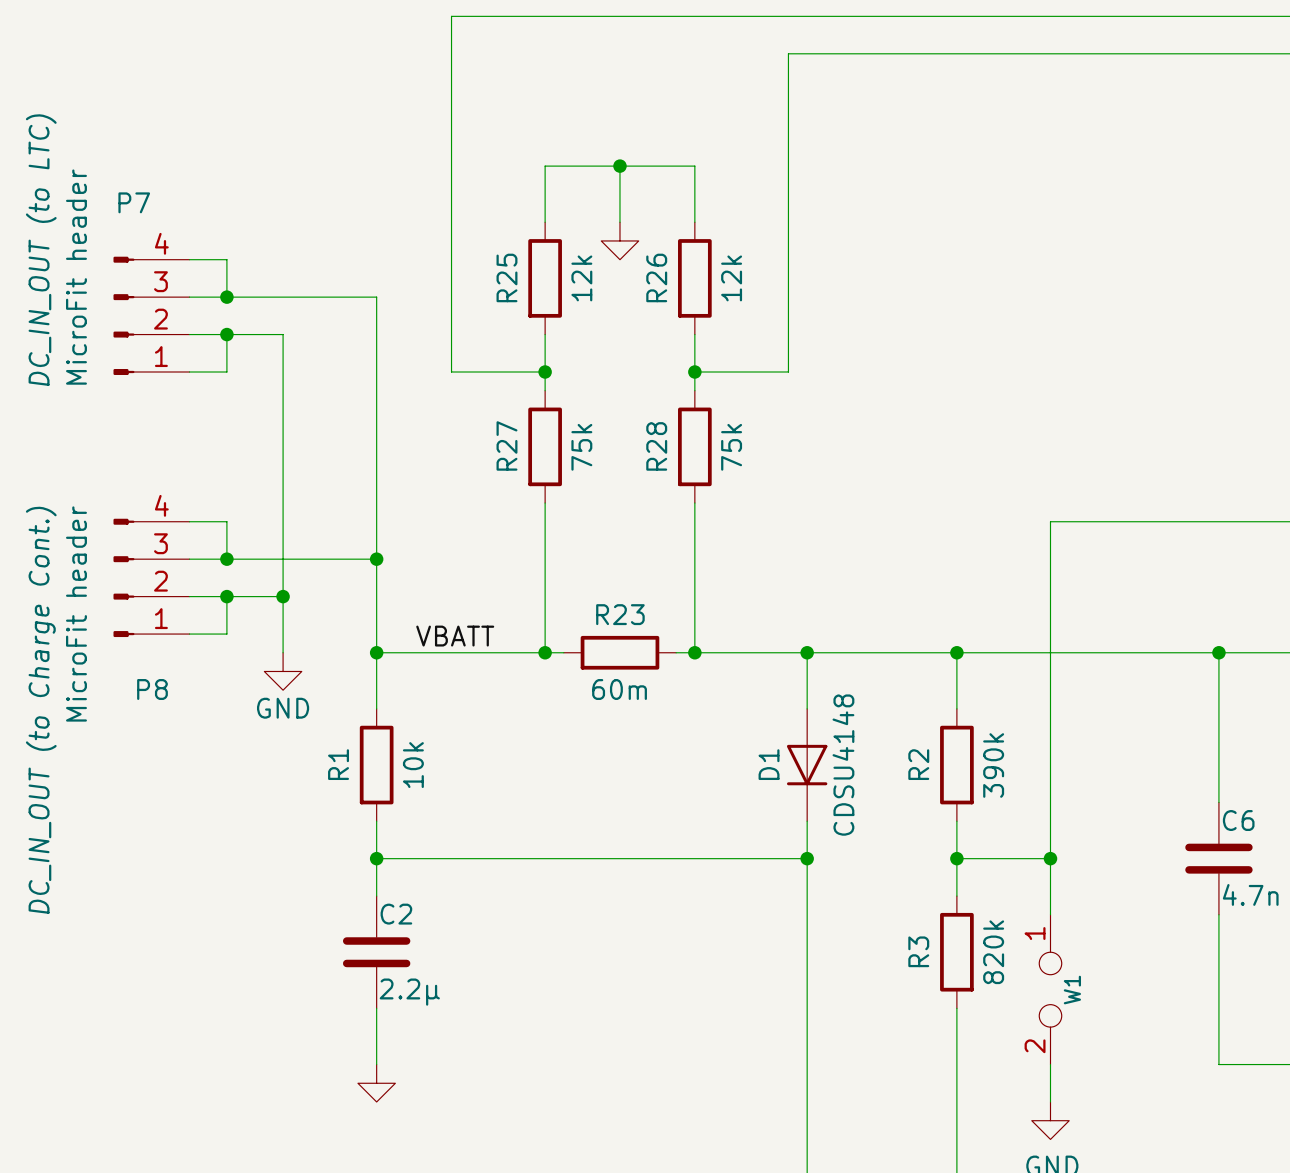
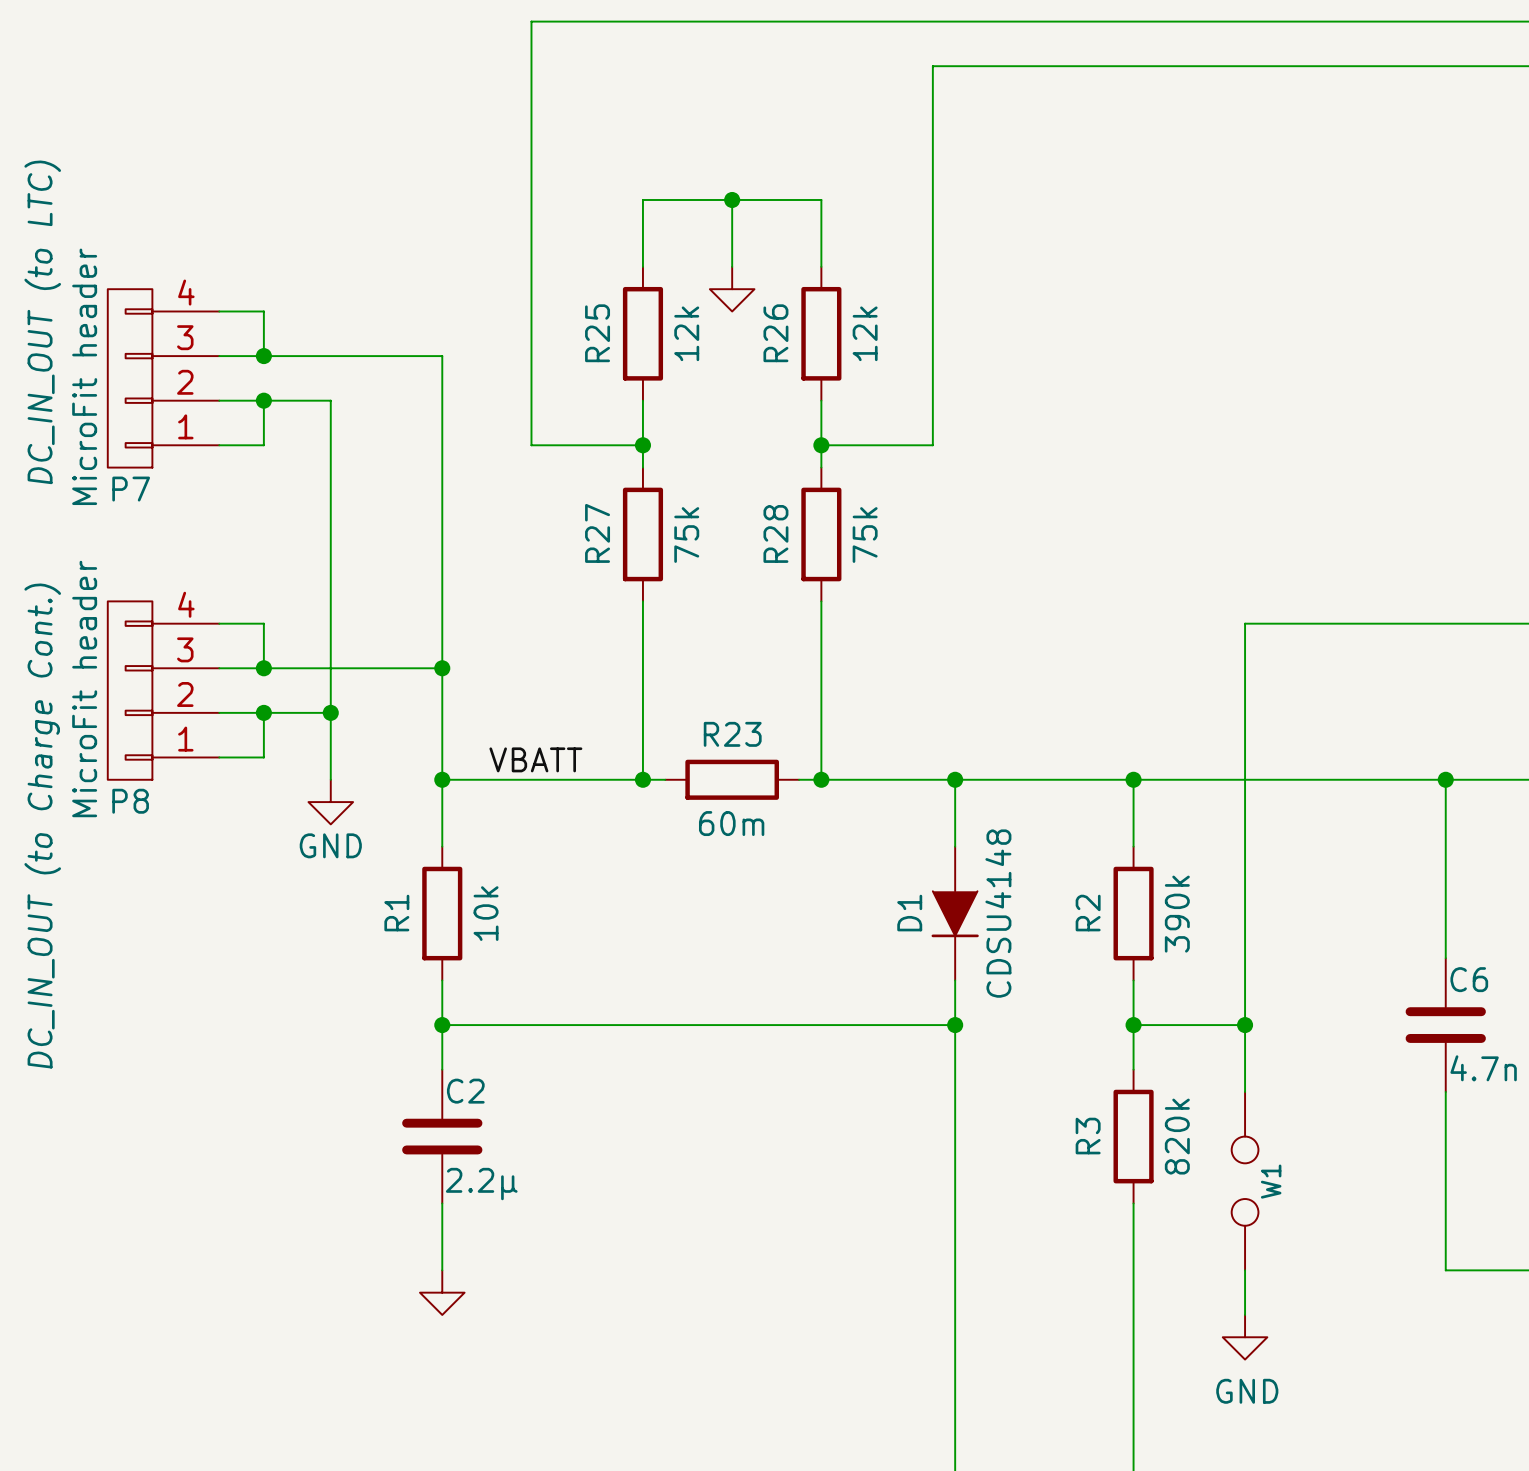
P7 name position: P7 (134, 202) -> P7 (131, 489)
P7 symbol: [113, 256, 190, 375] -> [107, 289, 220, 468]
P7 value position: MicroFit header (76, 277) -> MicroFit header (84, 376)
P8 symbol: [113, 518, 190, 638] -> [107, 601, 220, 780]
P8 value position: MicroFit header (76, 613) -> MicroFit header (84, 688)
P8 name position: P8 (152, 689) -> P8 (130, 801)
D1 symbol: [786, 708, 828, 822] -> [931, 846, 979, 981]
W1 pin number: 1 (1035, 933) -> none
W1 pin number: 2 (1035, 1046) -> none

